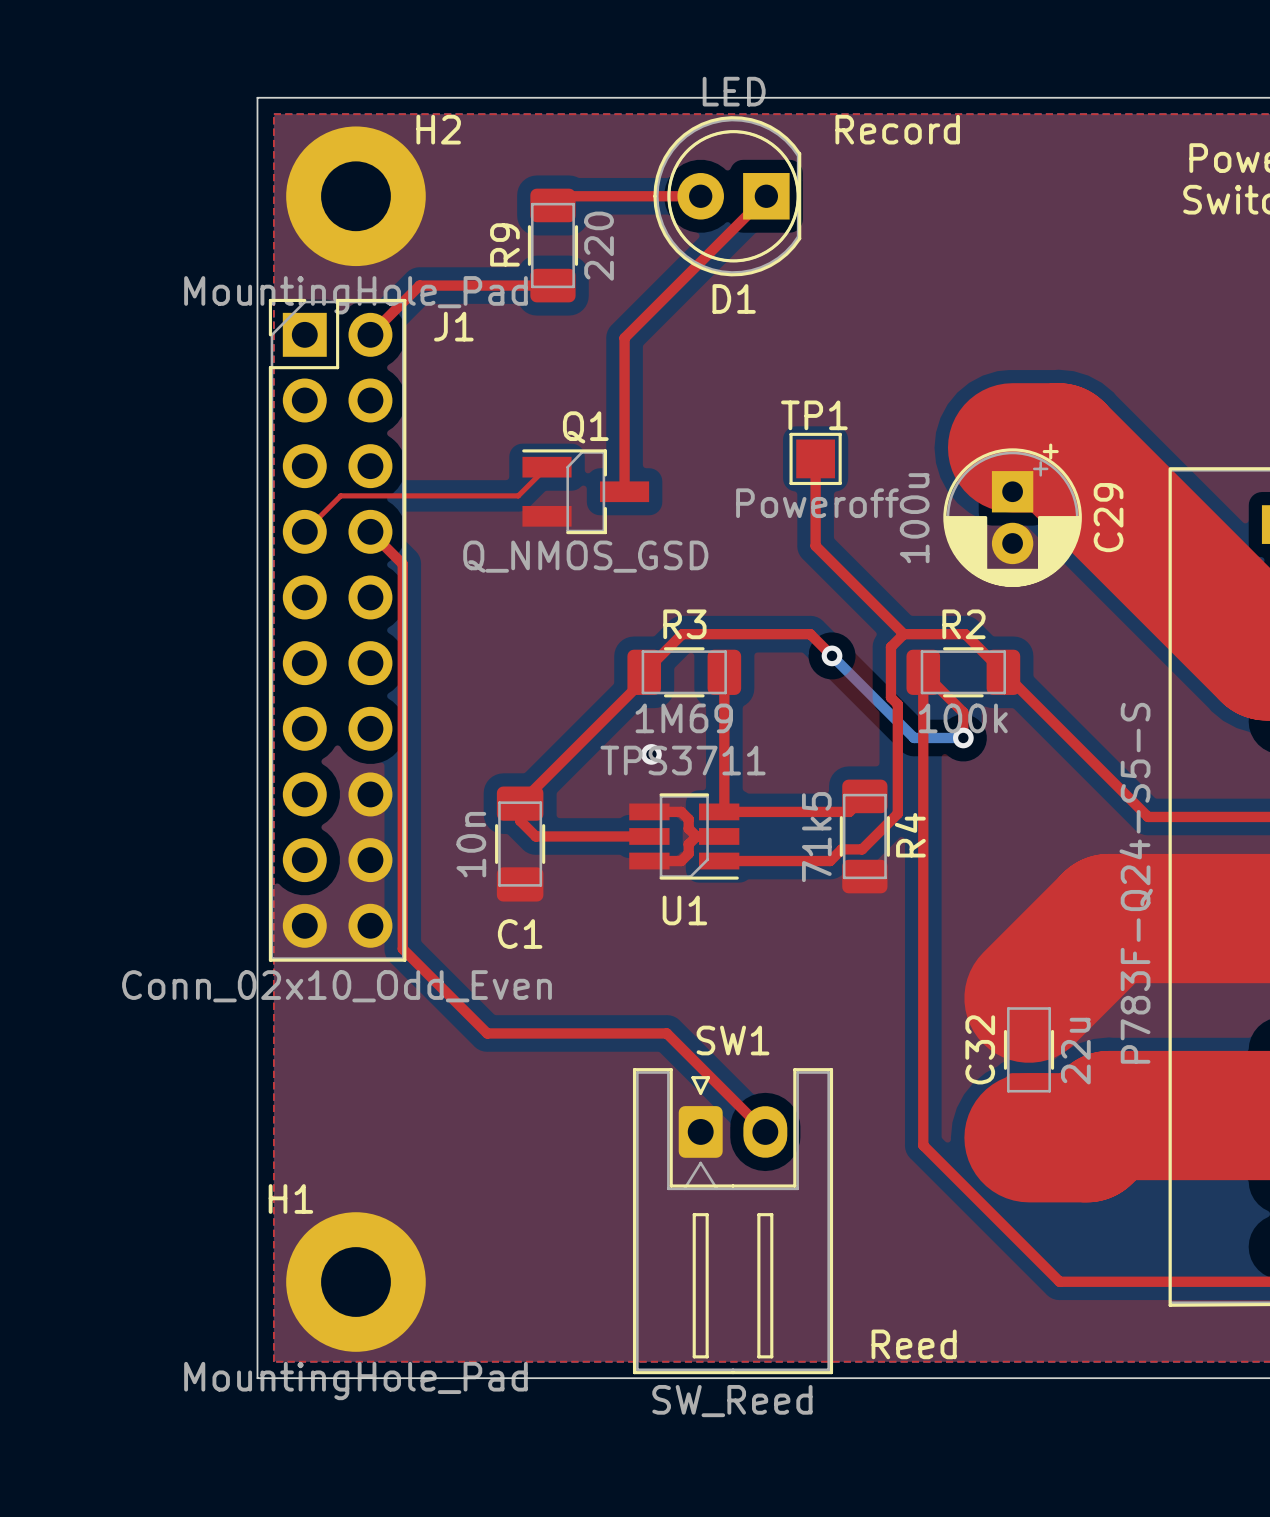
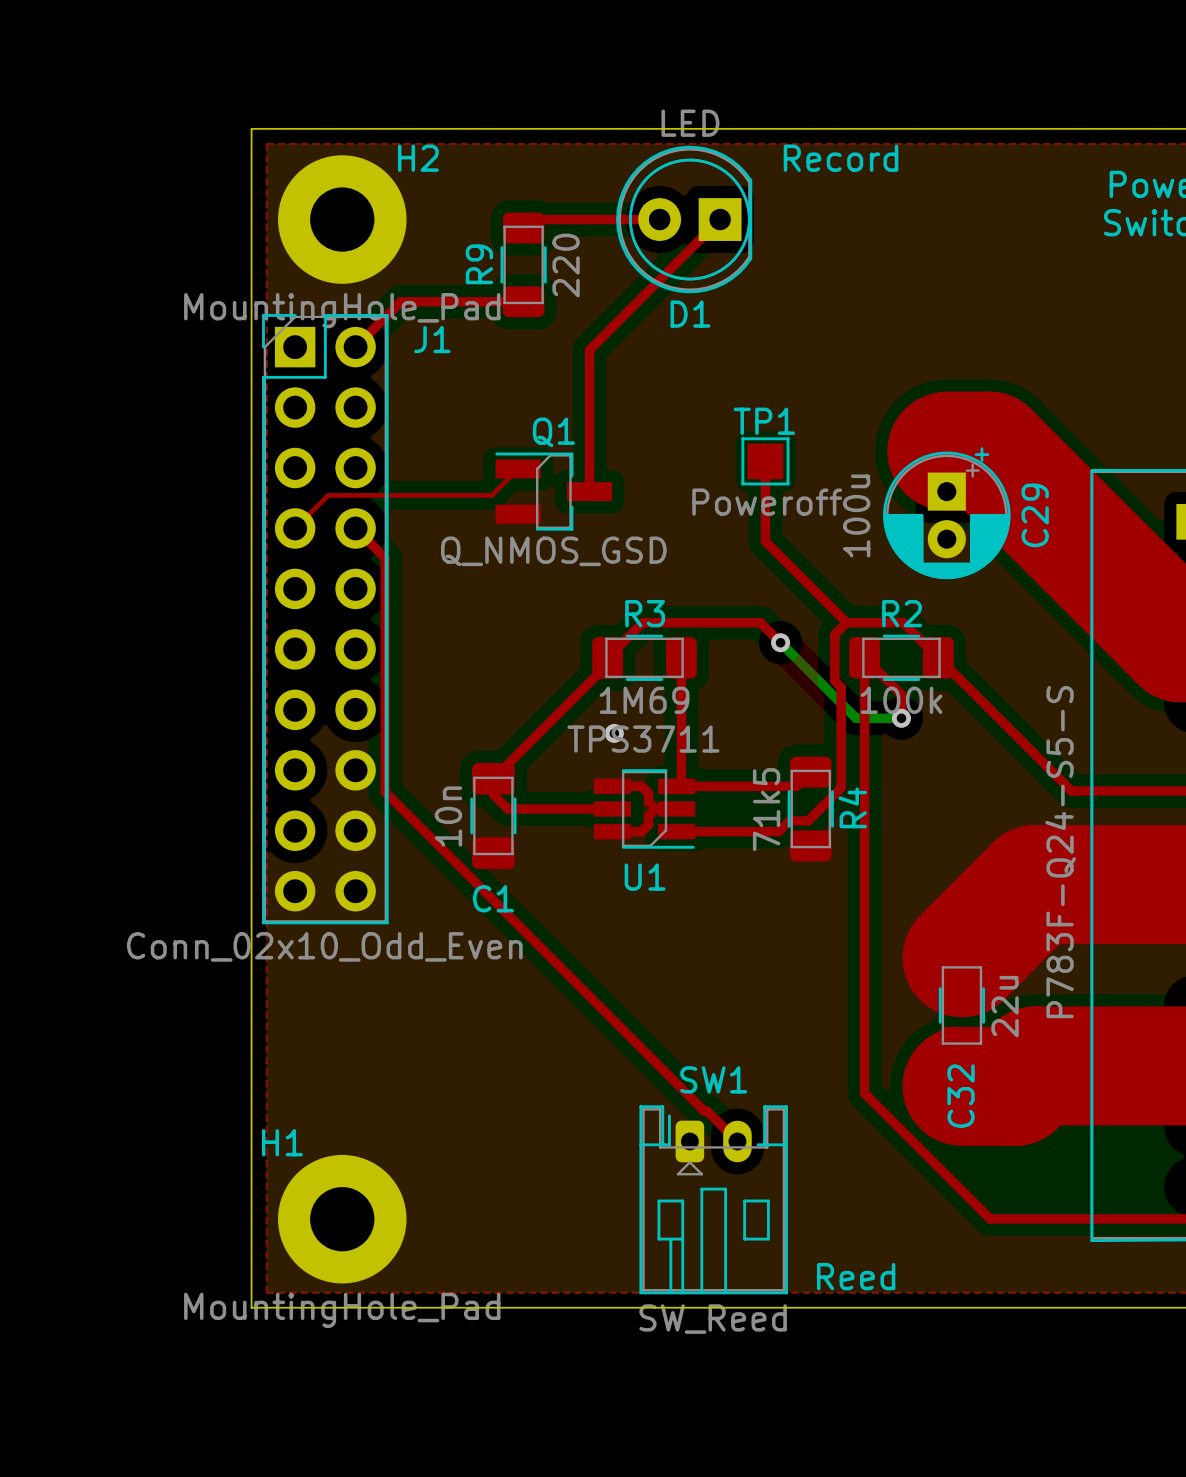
top track: (402, 818) (402, 948) (487, 1033) (666, 1033) (765, 1131) -> (385, 792) (704, 1111) (707, 1111) (737, 1141)
C32 name position: C32 (980, 1049) -> C32 (961, 1096)
SW1 footprint: [632, 1068, 834, 1375] -> [639, 1105, 788, 1295]

